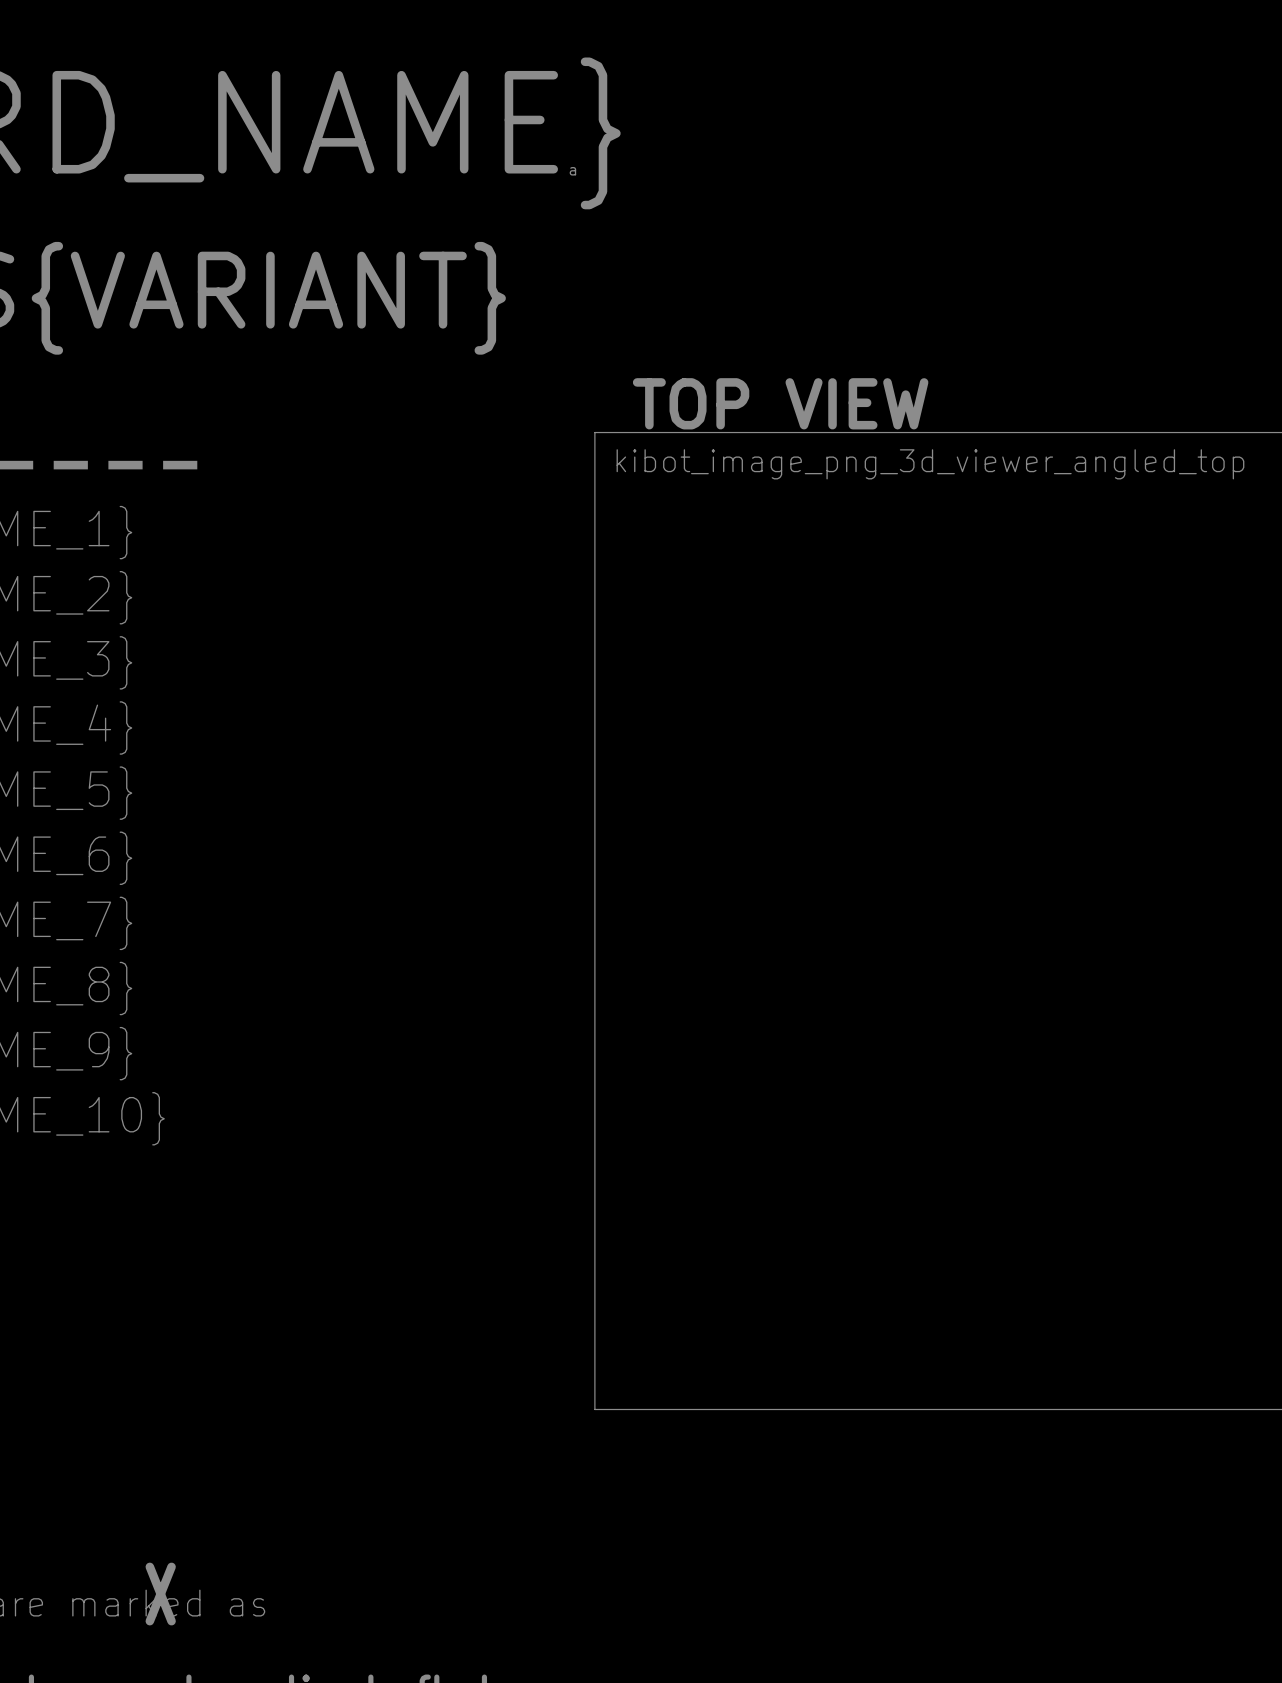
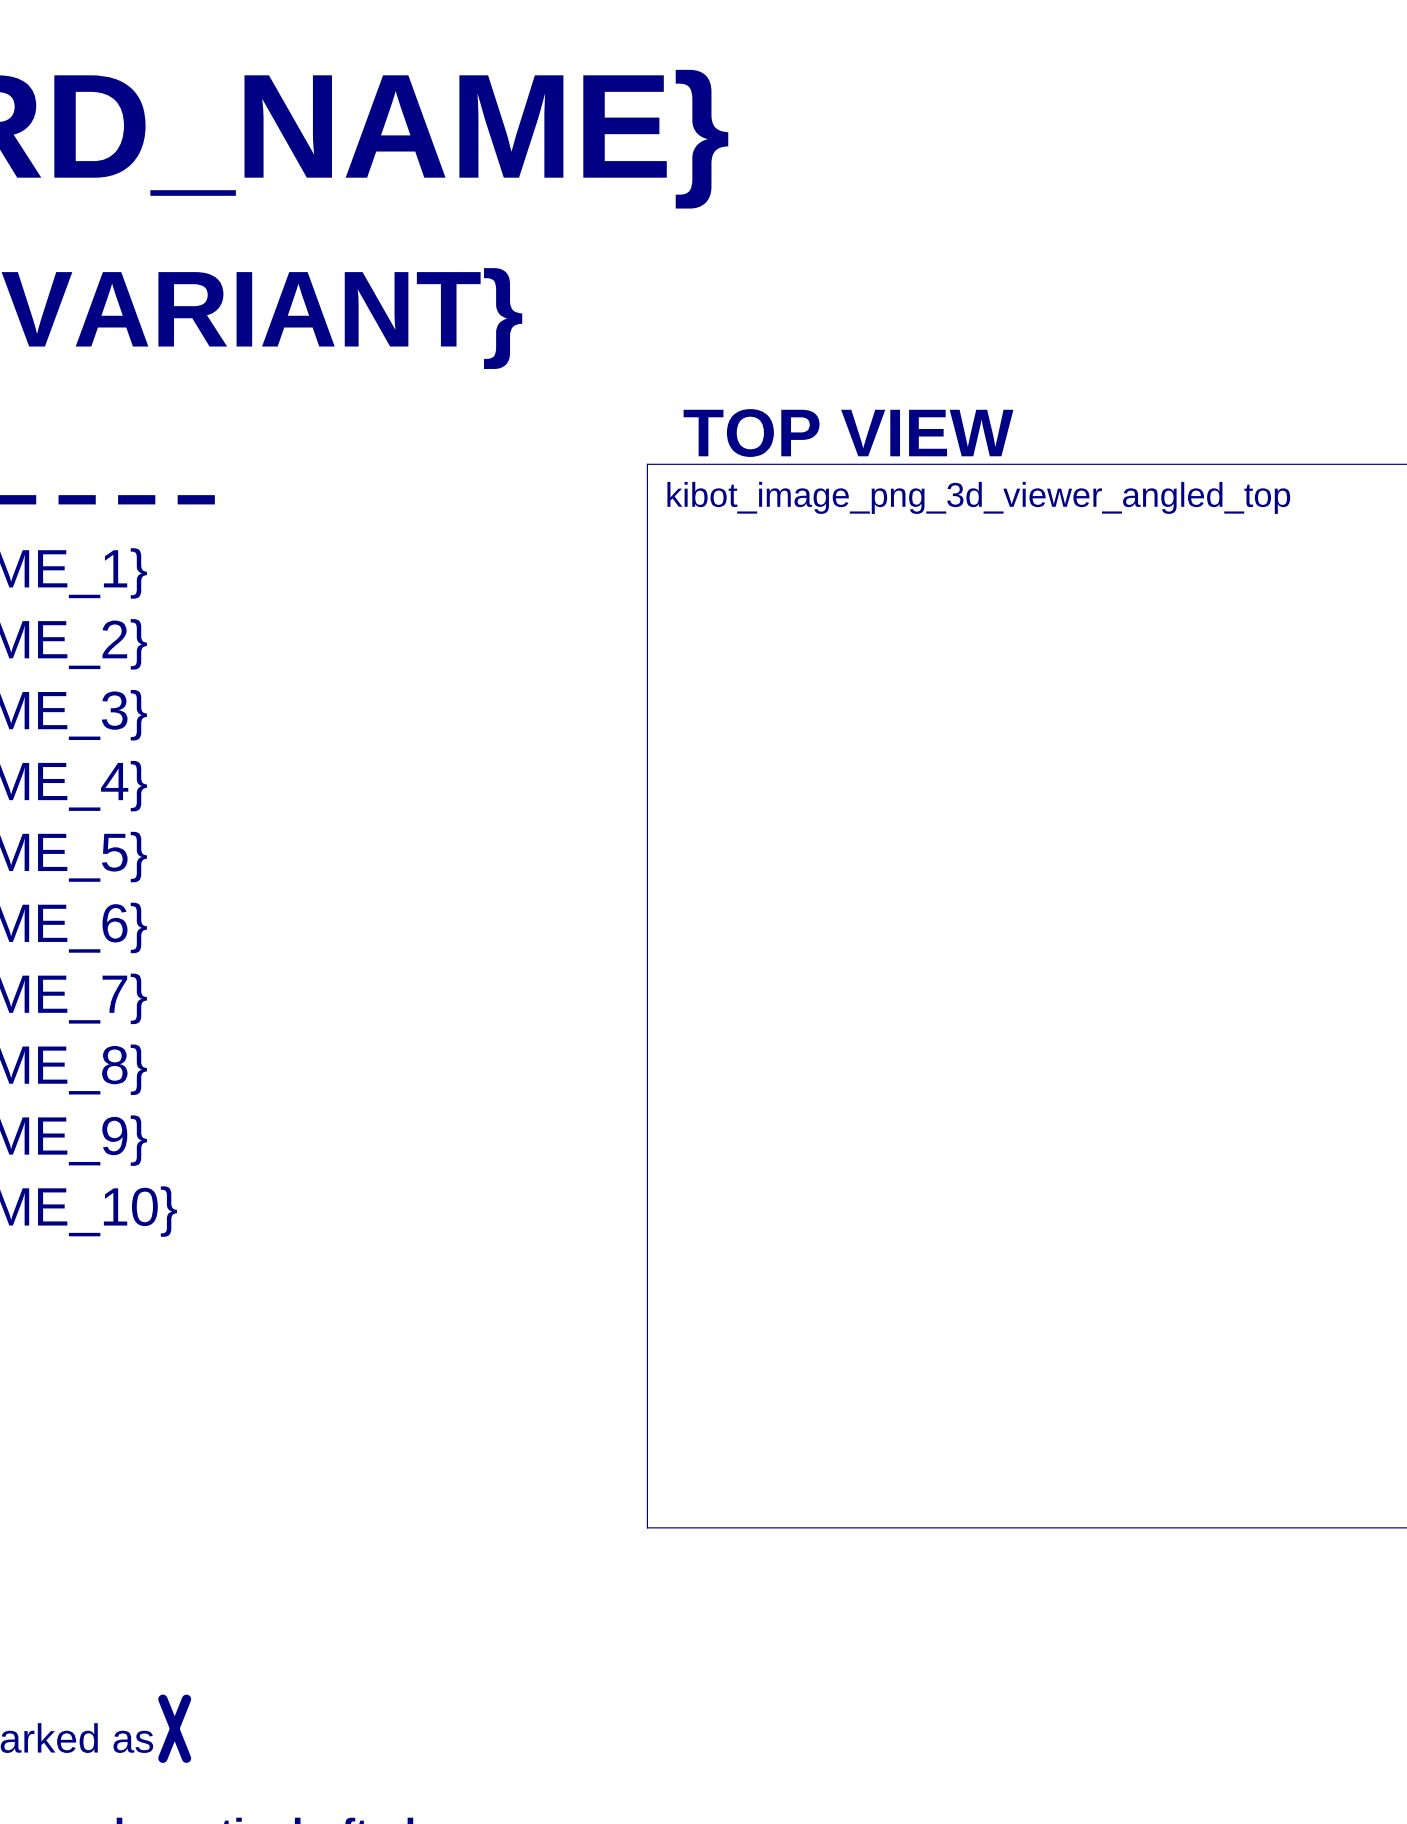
text: a (572, 171) -> none

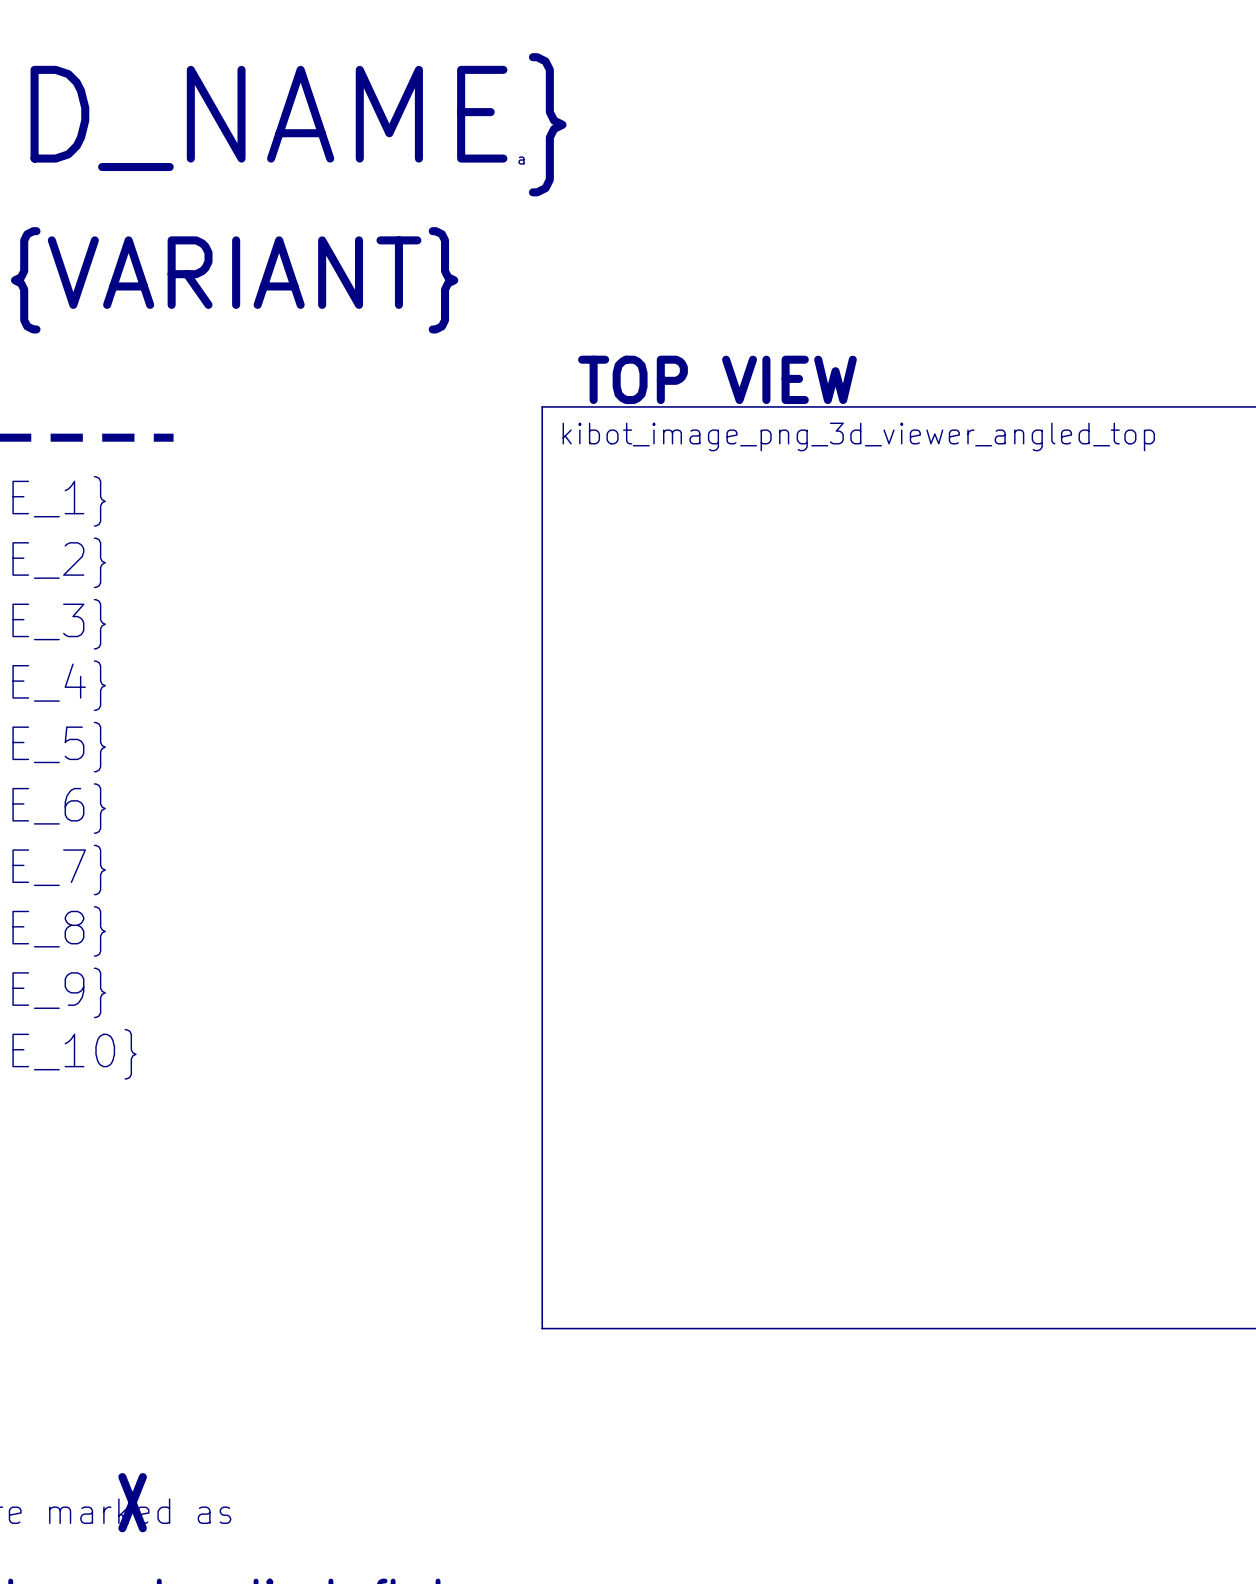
text: none -> a (521, 160)

